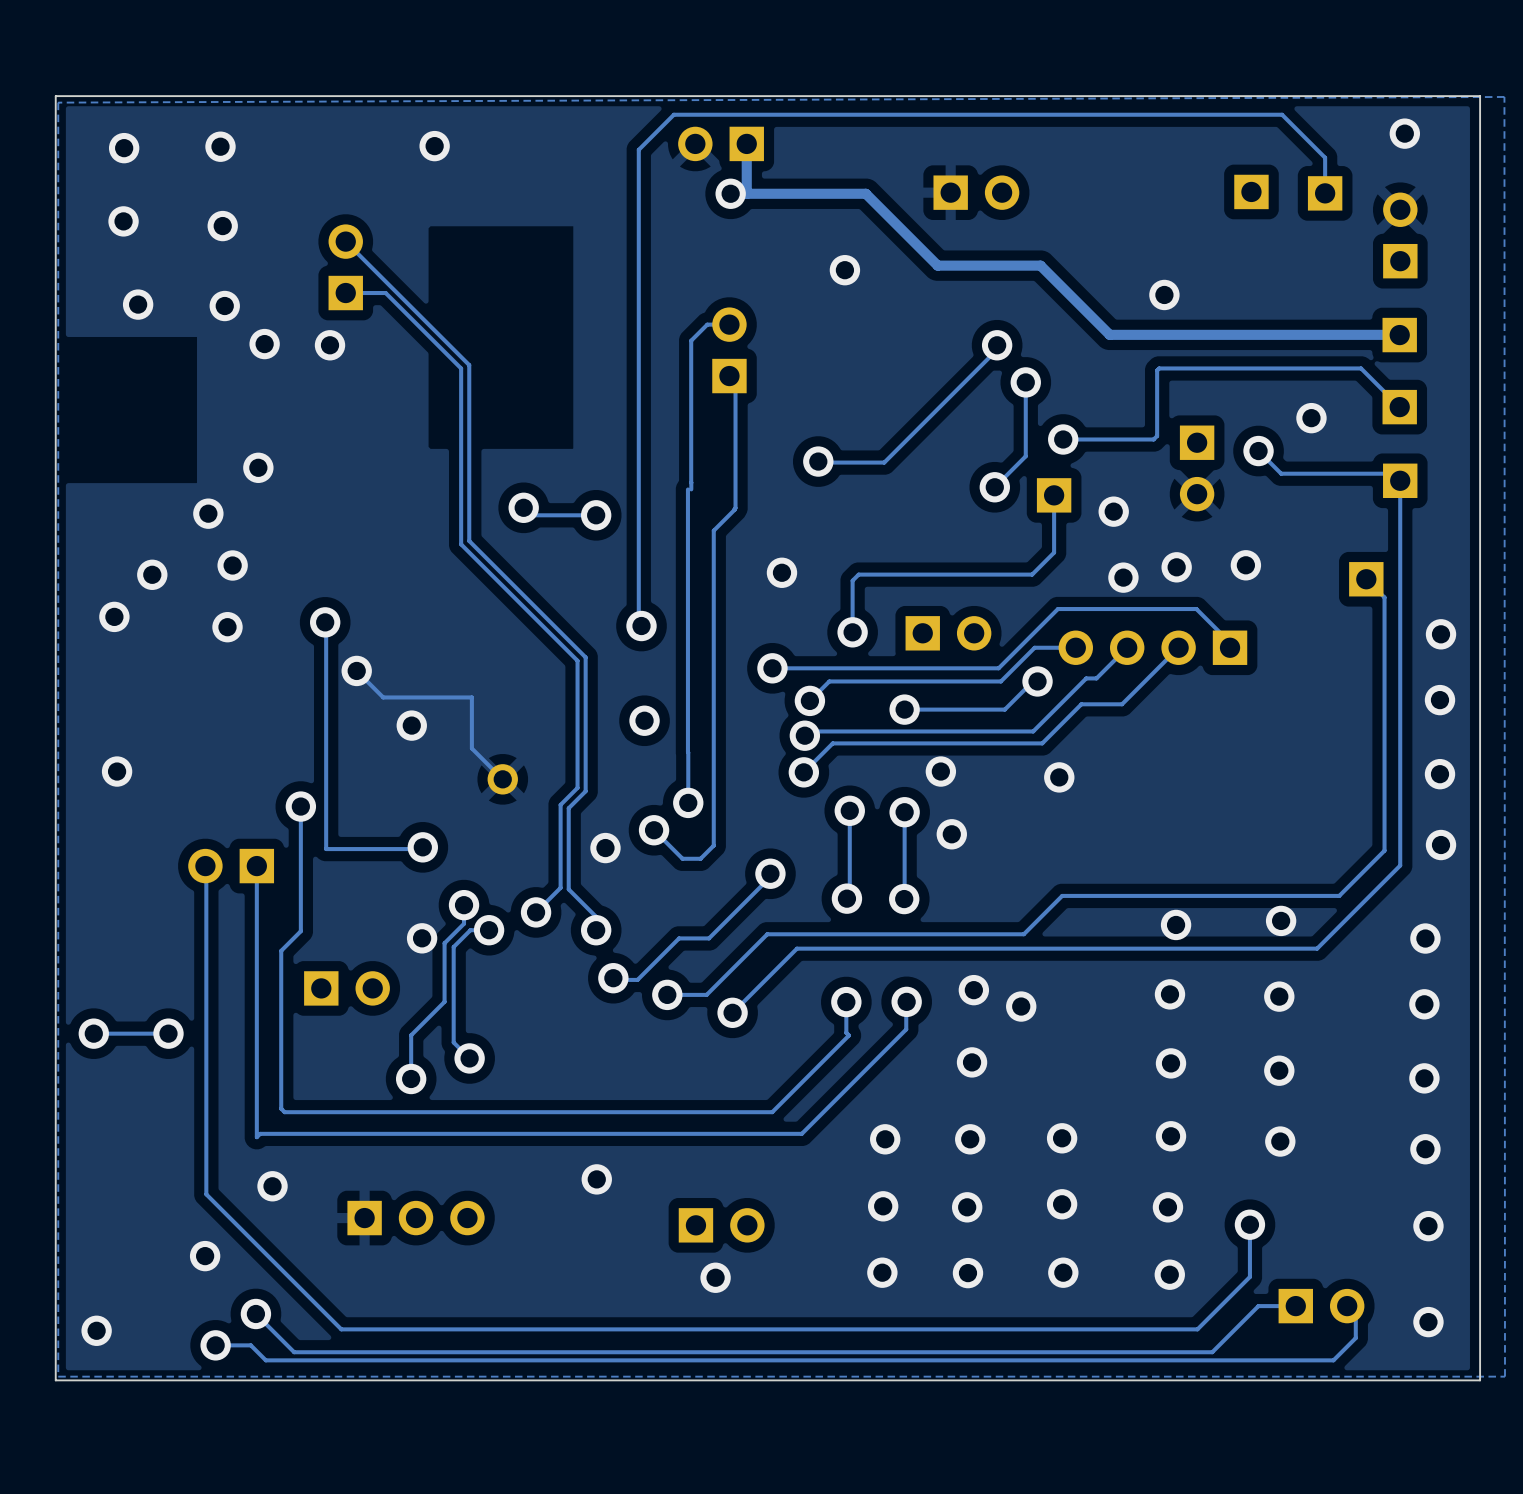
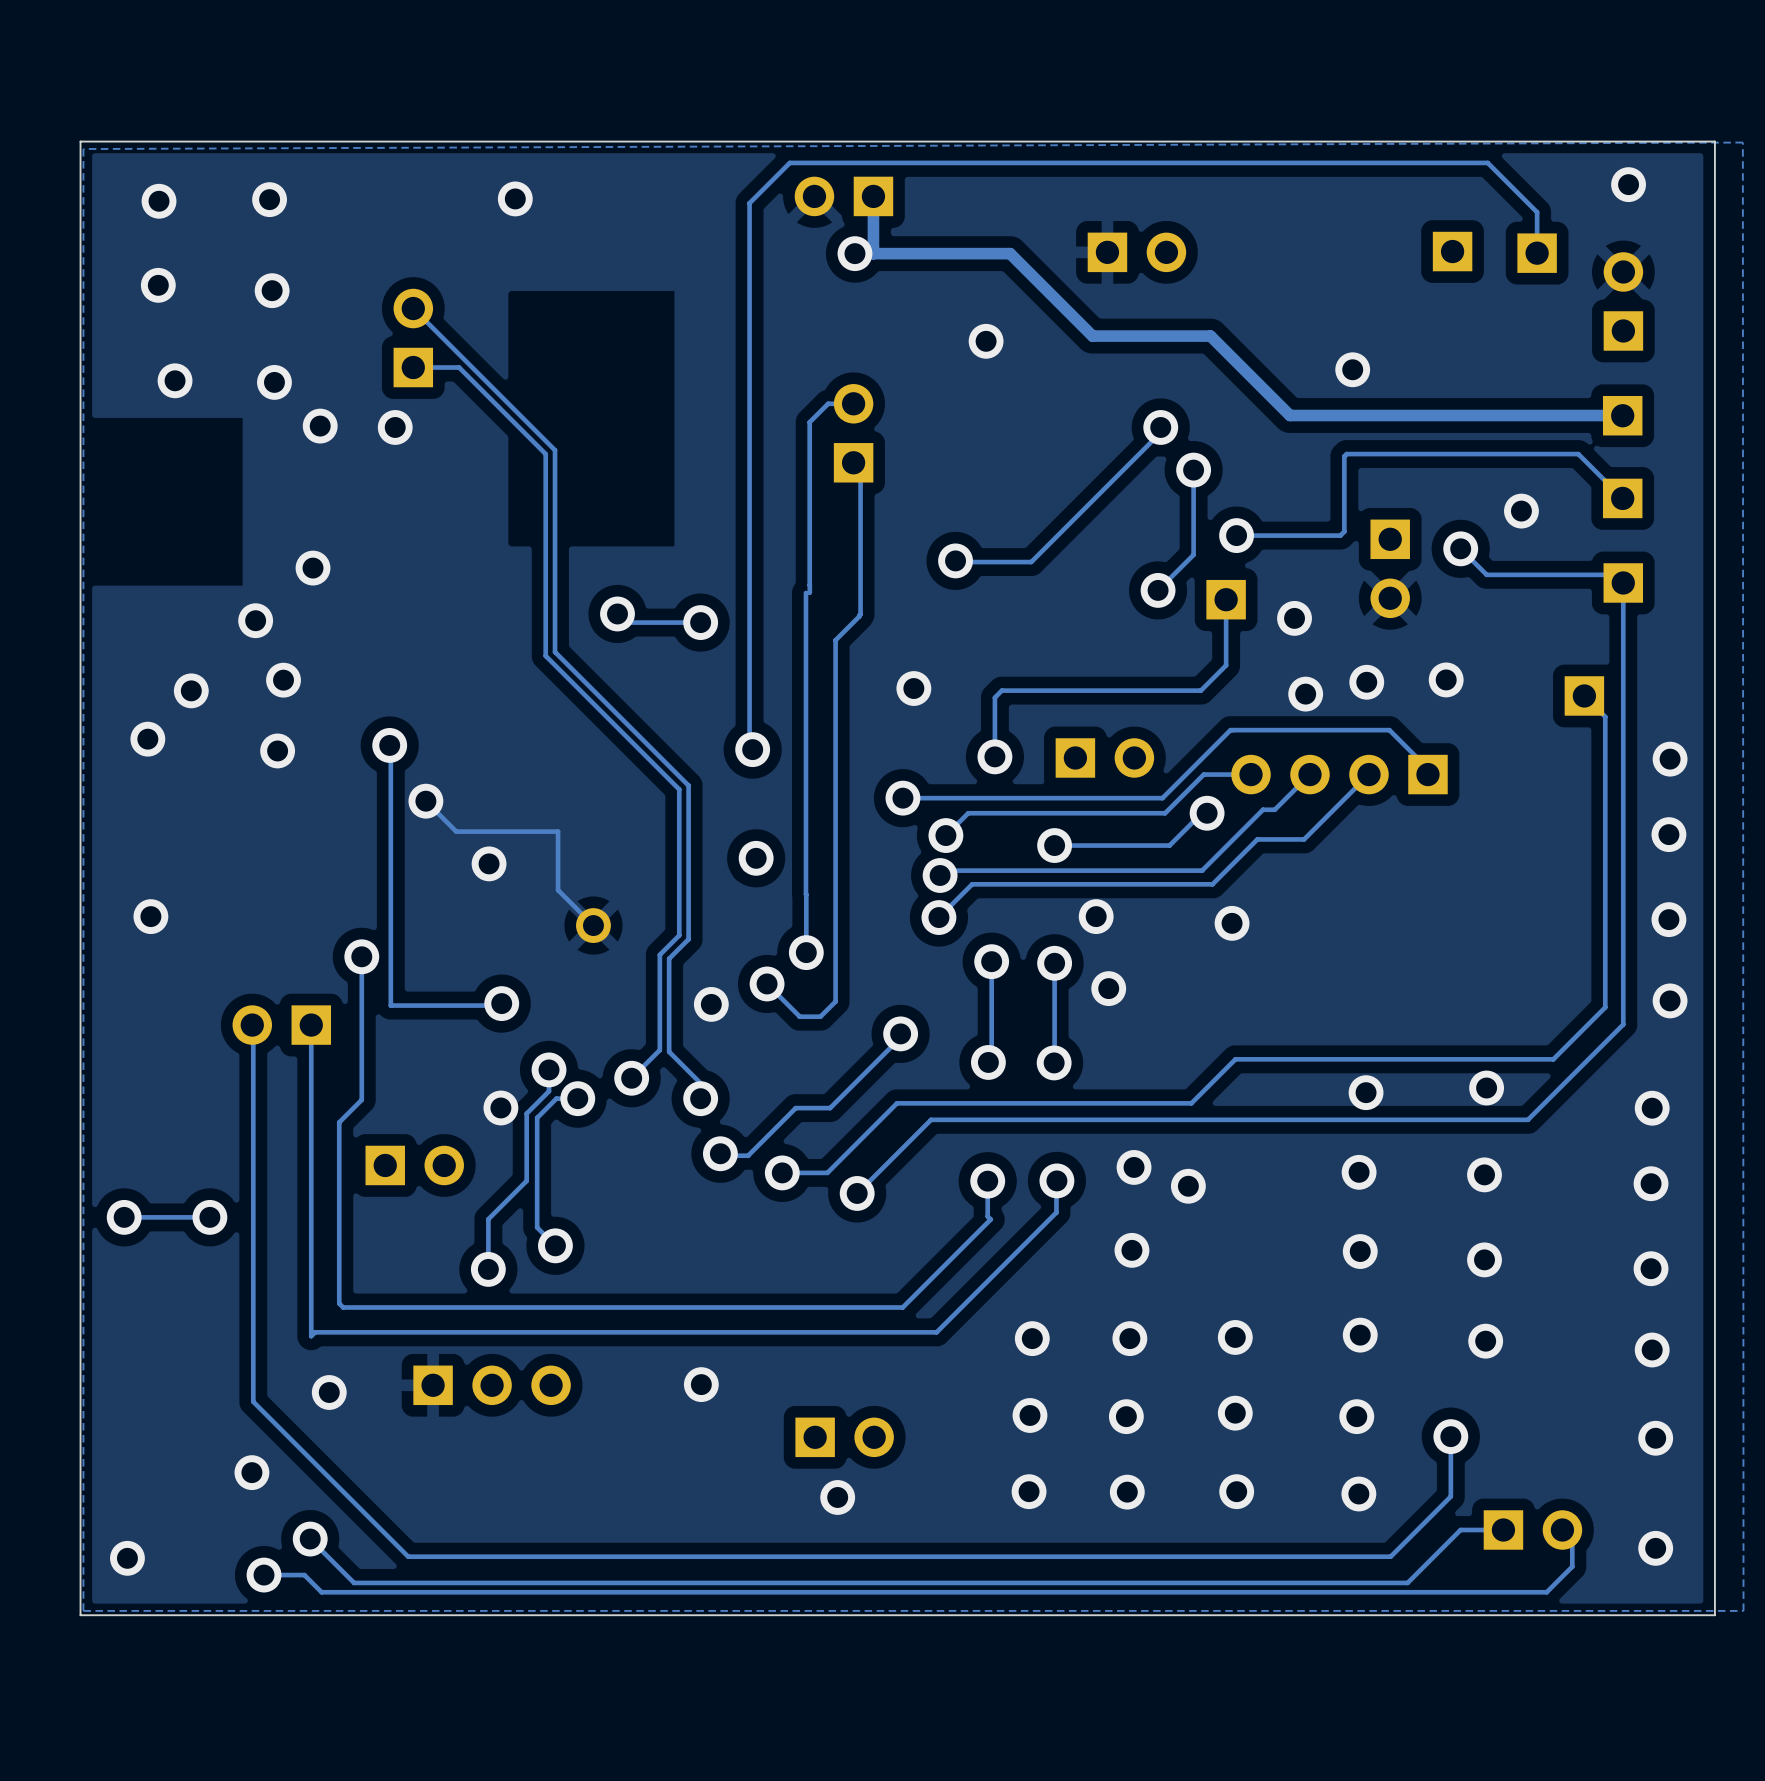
part position: (416, 1218) -> (492, 1385)

